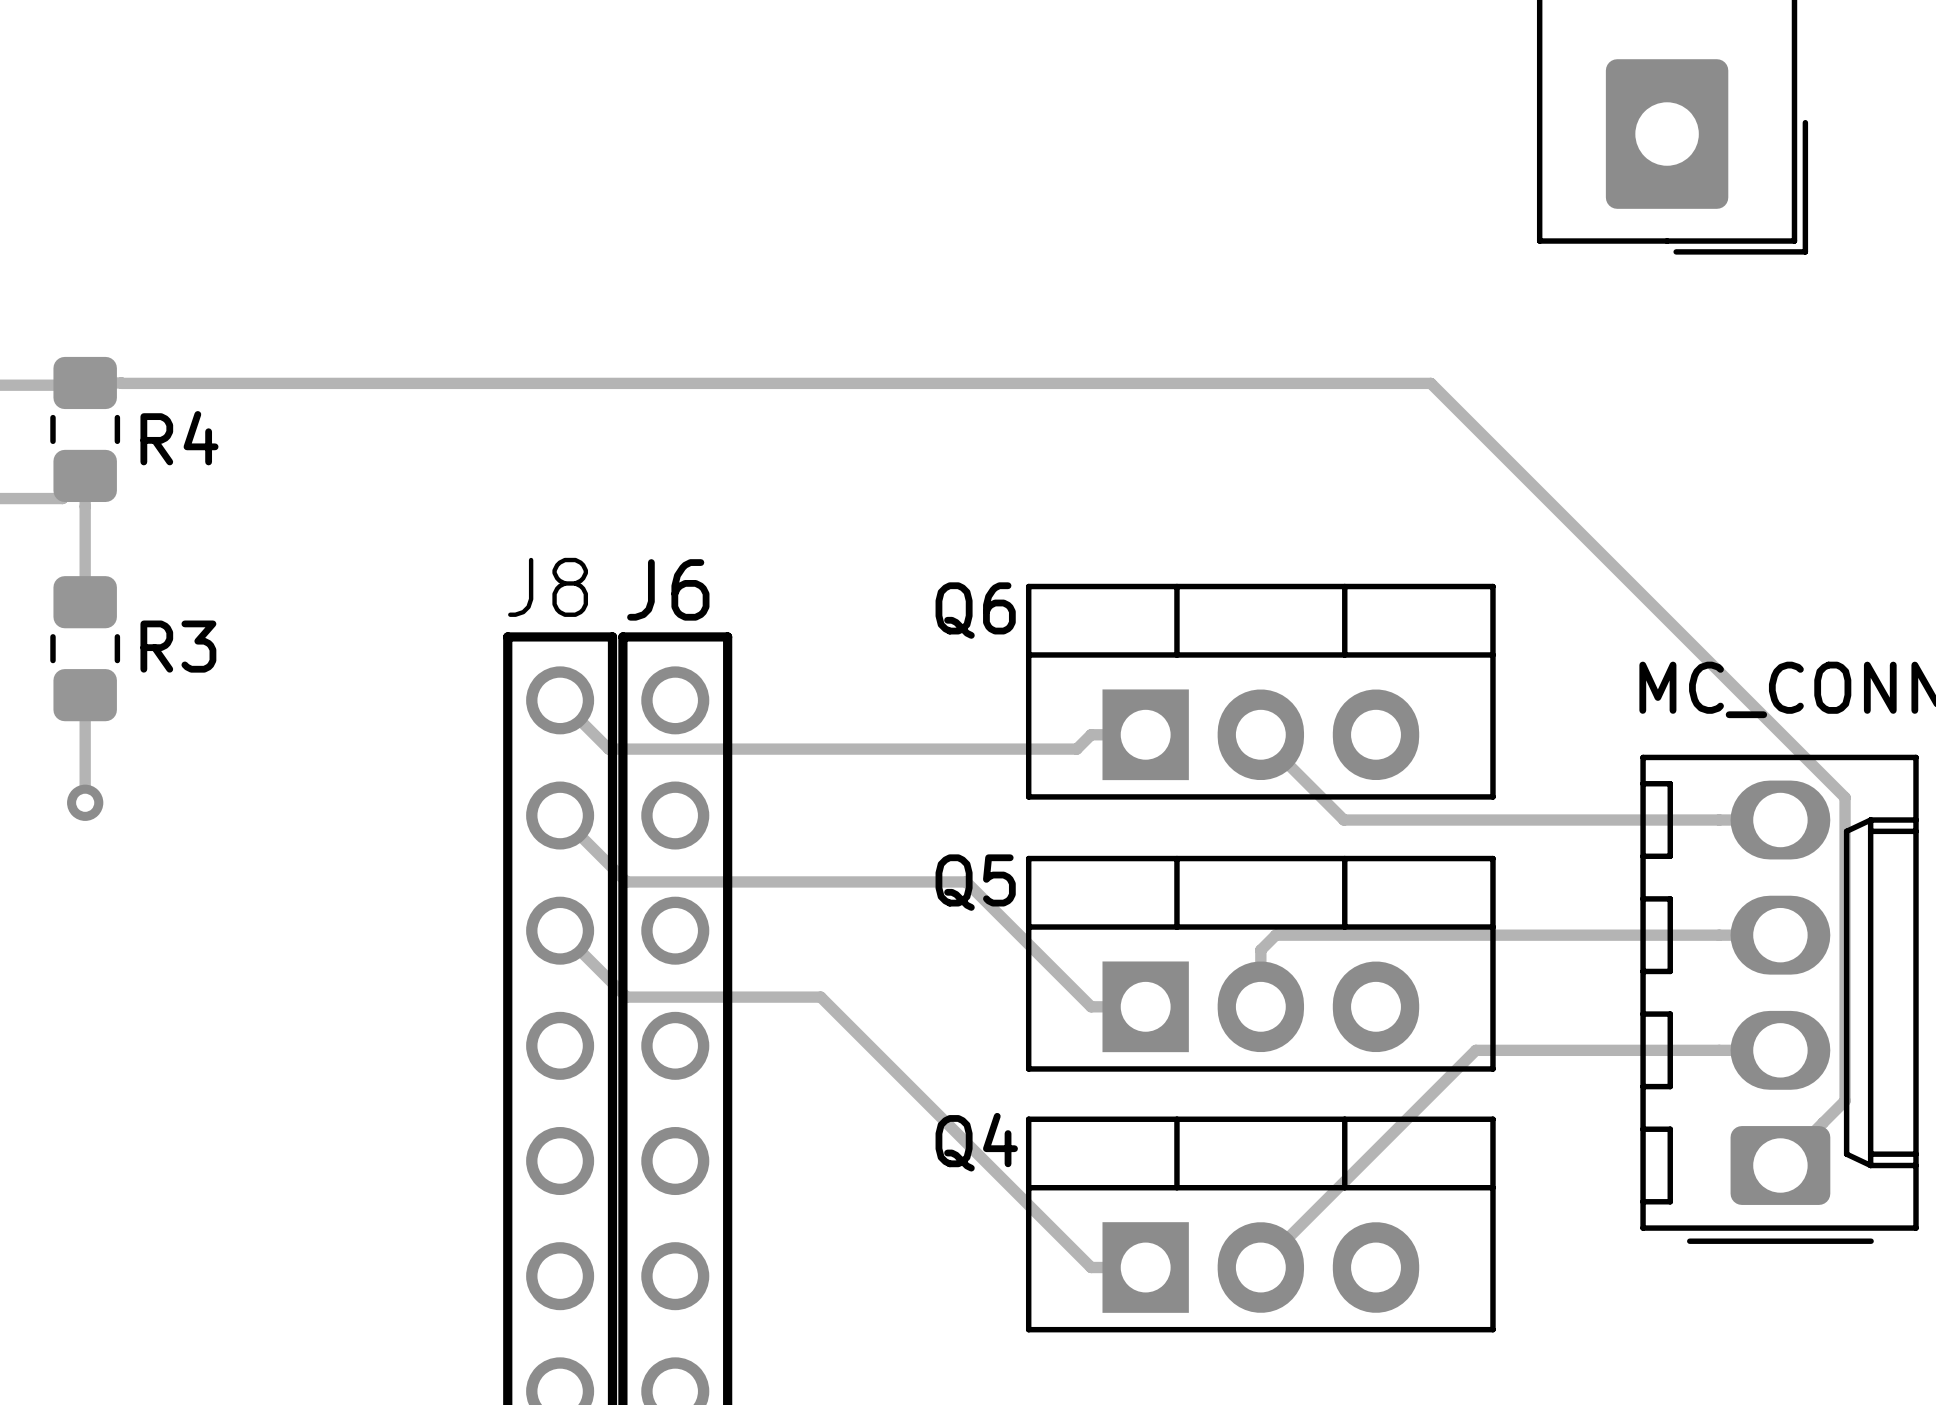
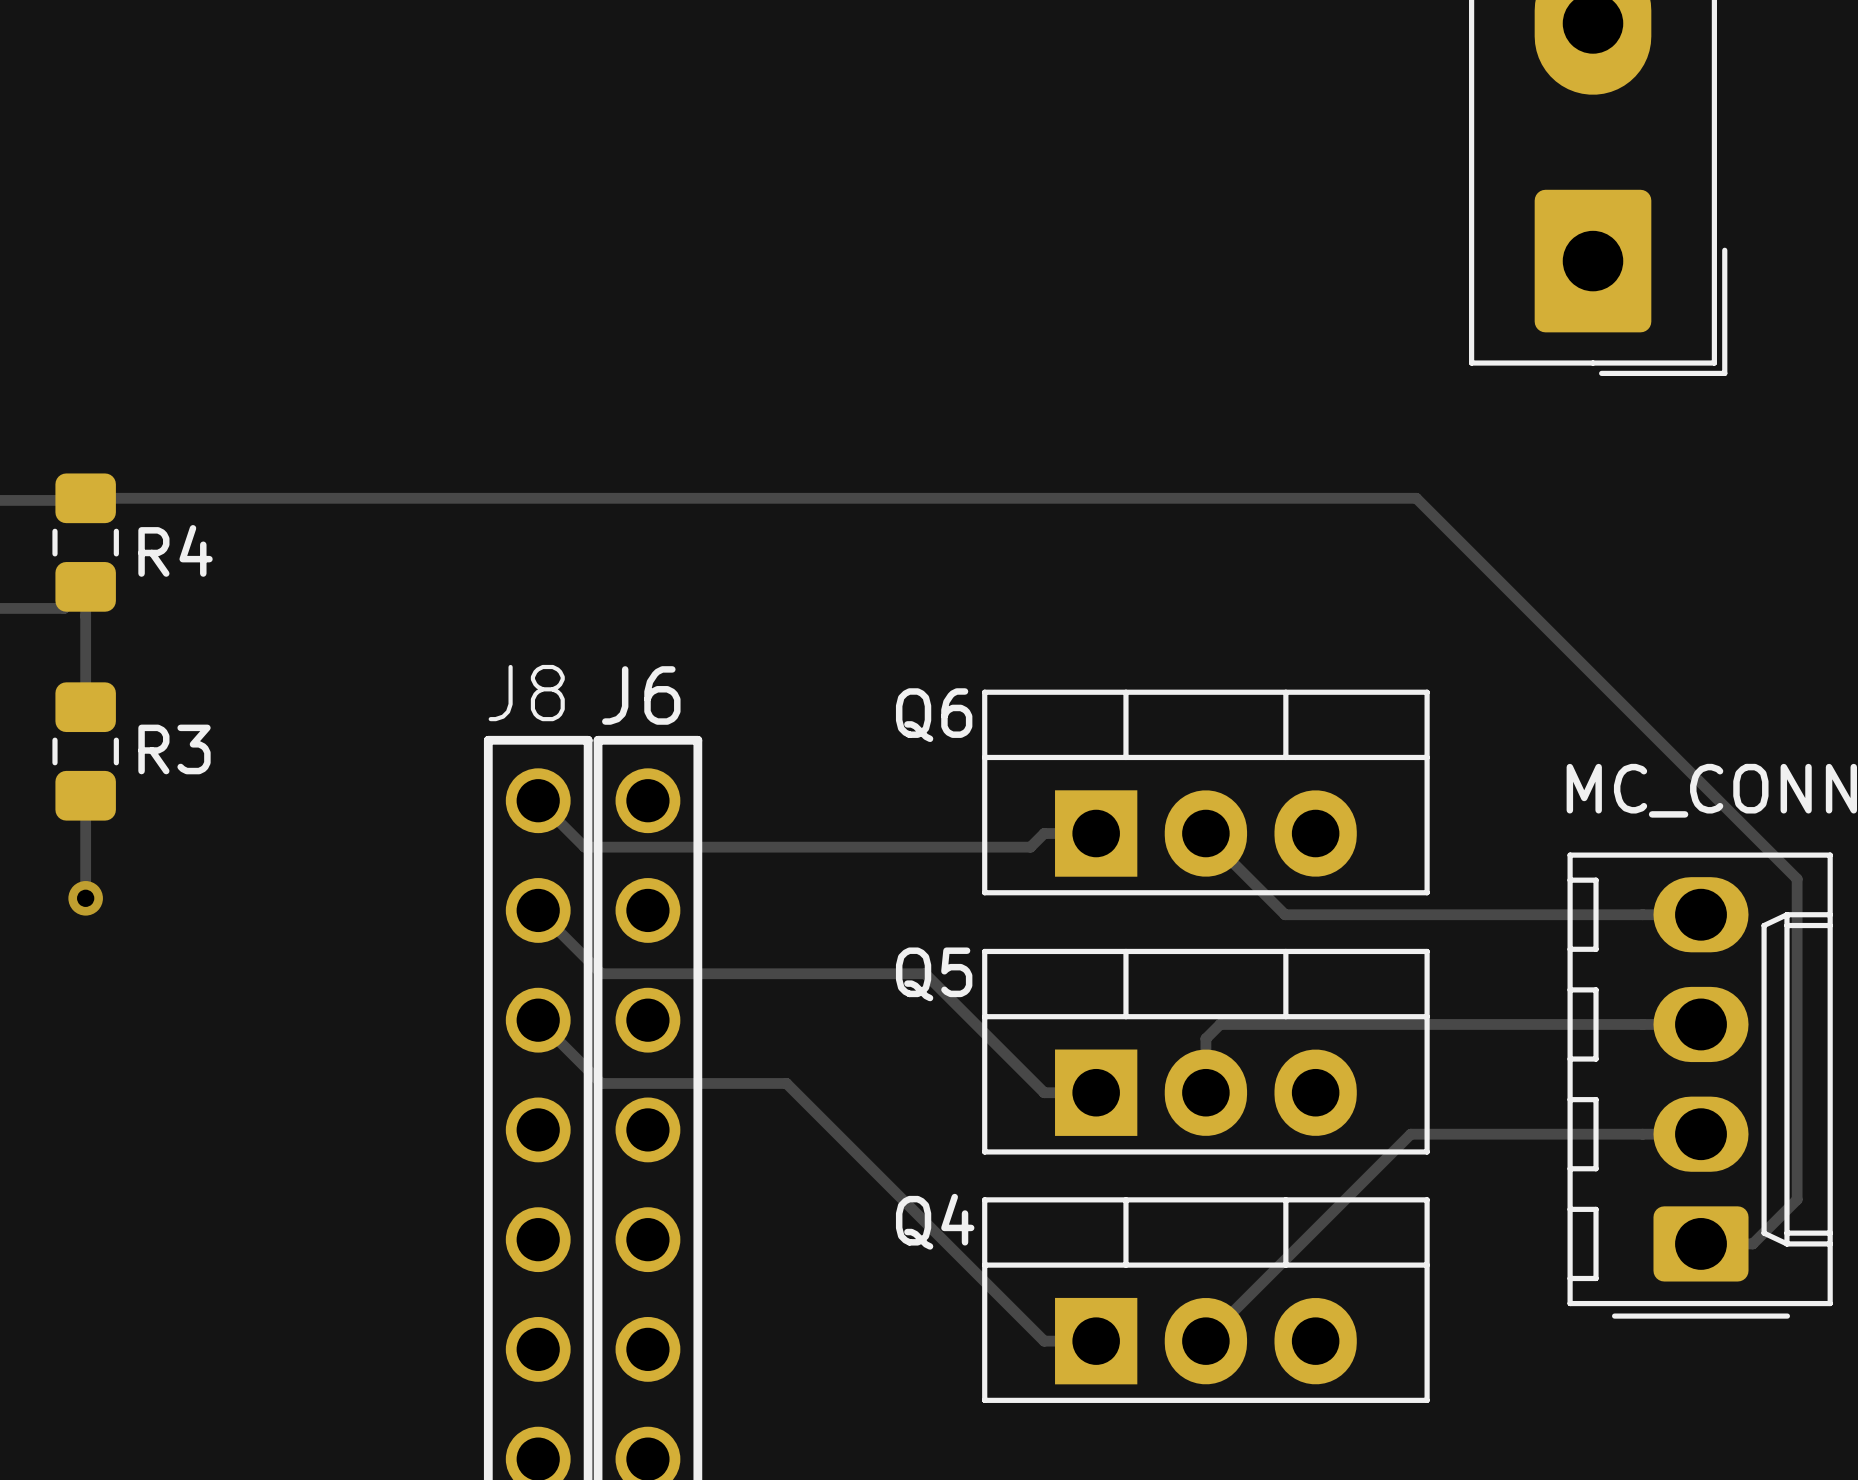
track: (121, 383) (1430, 383) (1845, 797) (1845, 1100) (1780, 1165) -> (120, 498) (1416, 498) (1797, 879) (1797, 1199) (1752, 1243) (1701, 1243)

